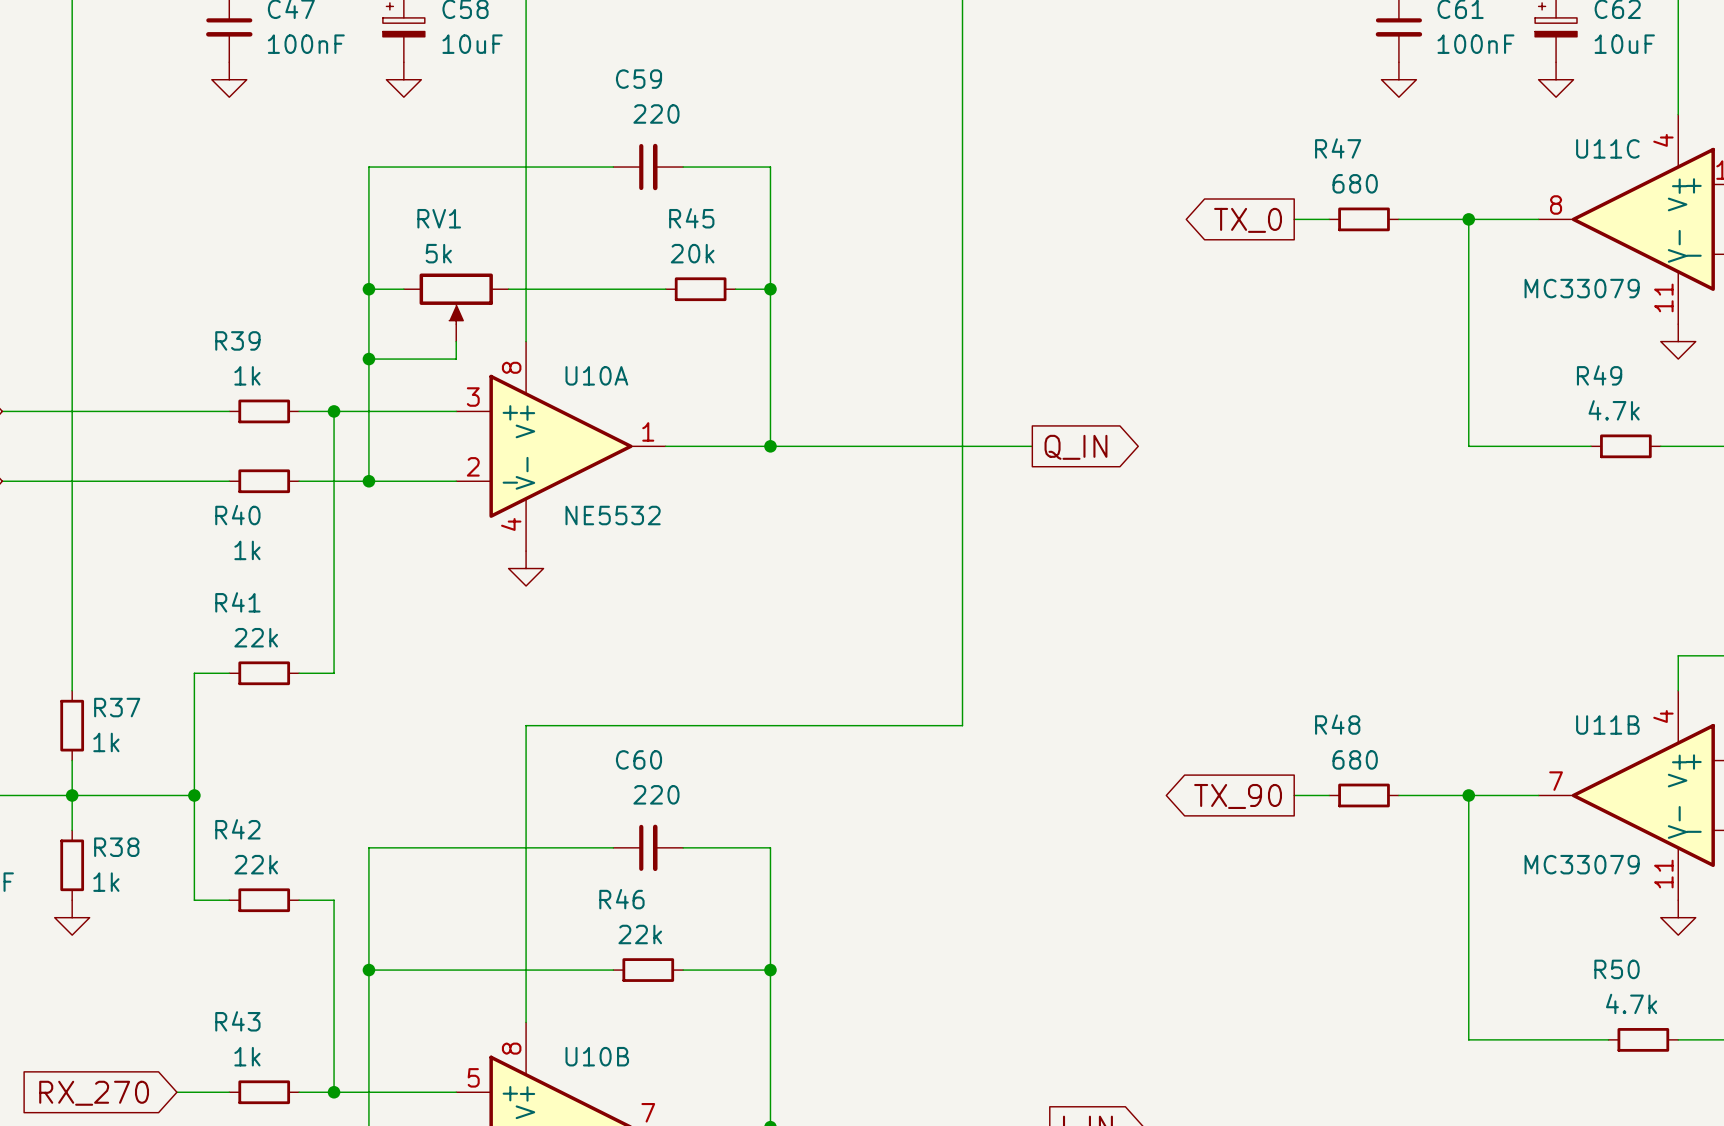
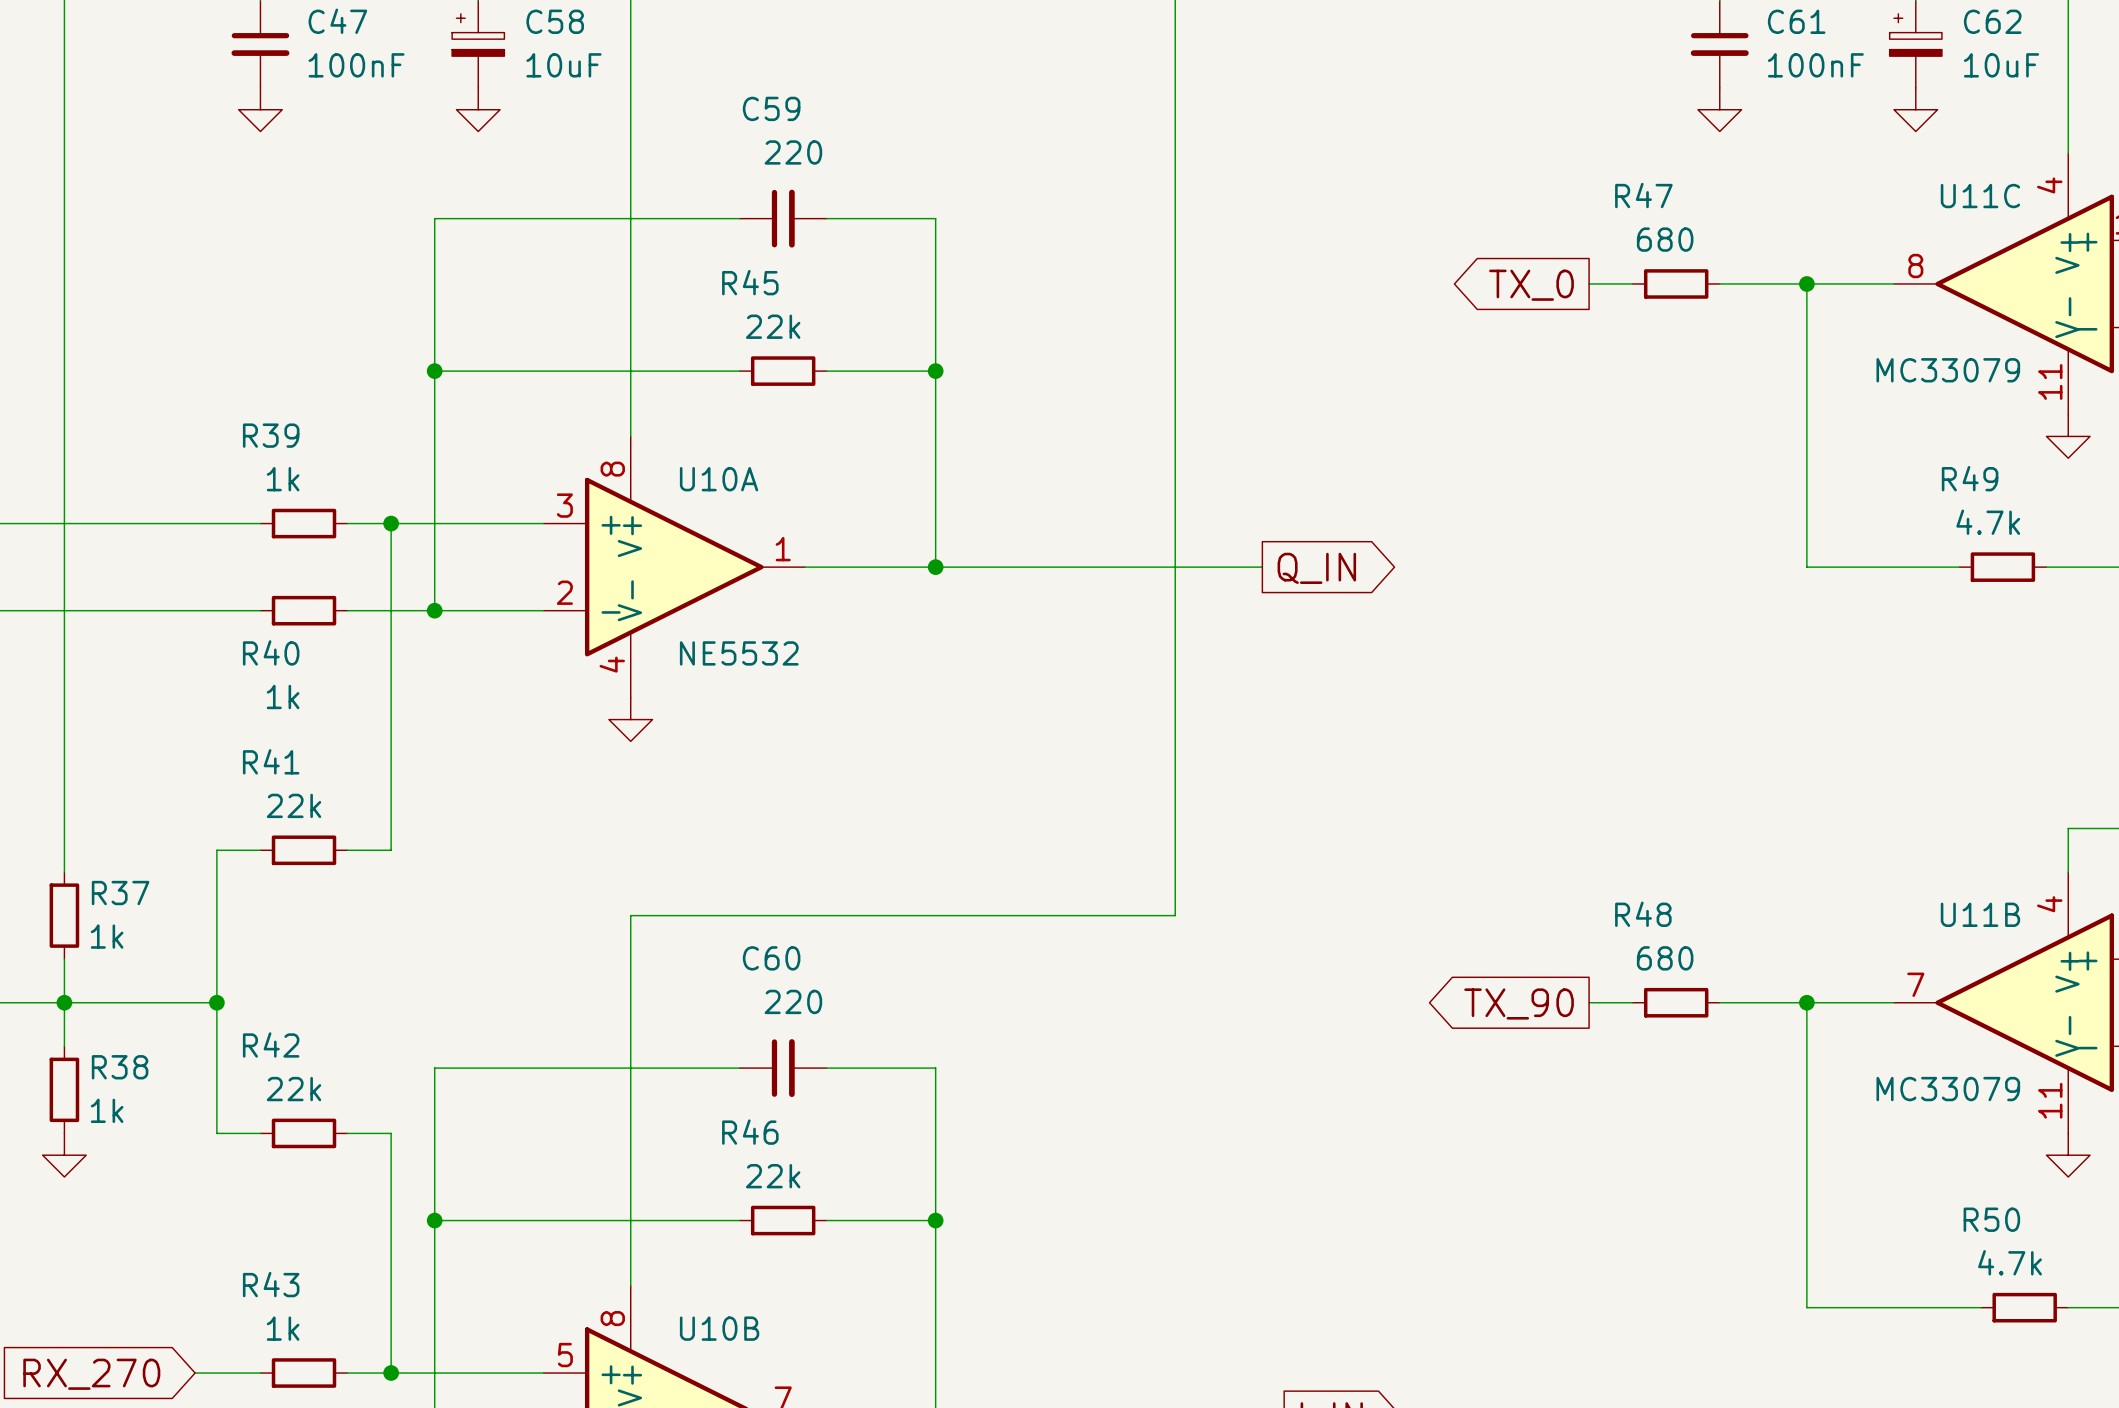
R45 name position: R45 (691, 218) -> R45 (750, 282)
R45 value: 20k (692, 253) -> 22k (773, 326)
wire: none -> (478, 371) (608, 371)
wire: (613, 289) (665, 289) -> (826, 371) (892, 371)
R45 position: (700, 289) -> (783, 371)
RV1: 5k (456, 307) -> none
wire: (456, 341) (456, 359) (368, 359) -> none
junction: (368, 359) -> none

